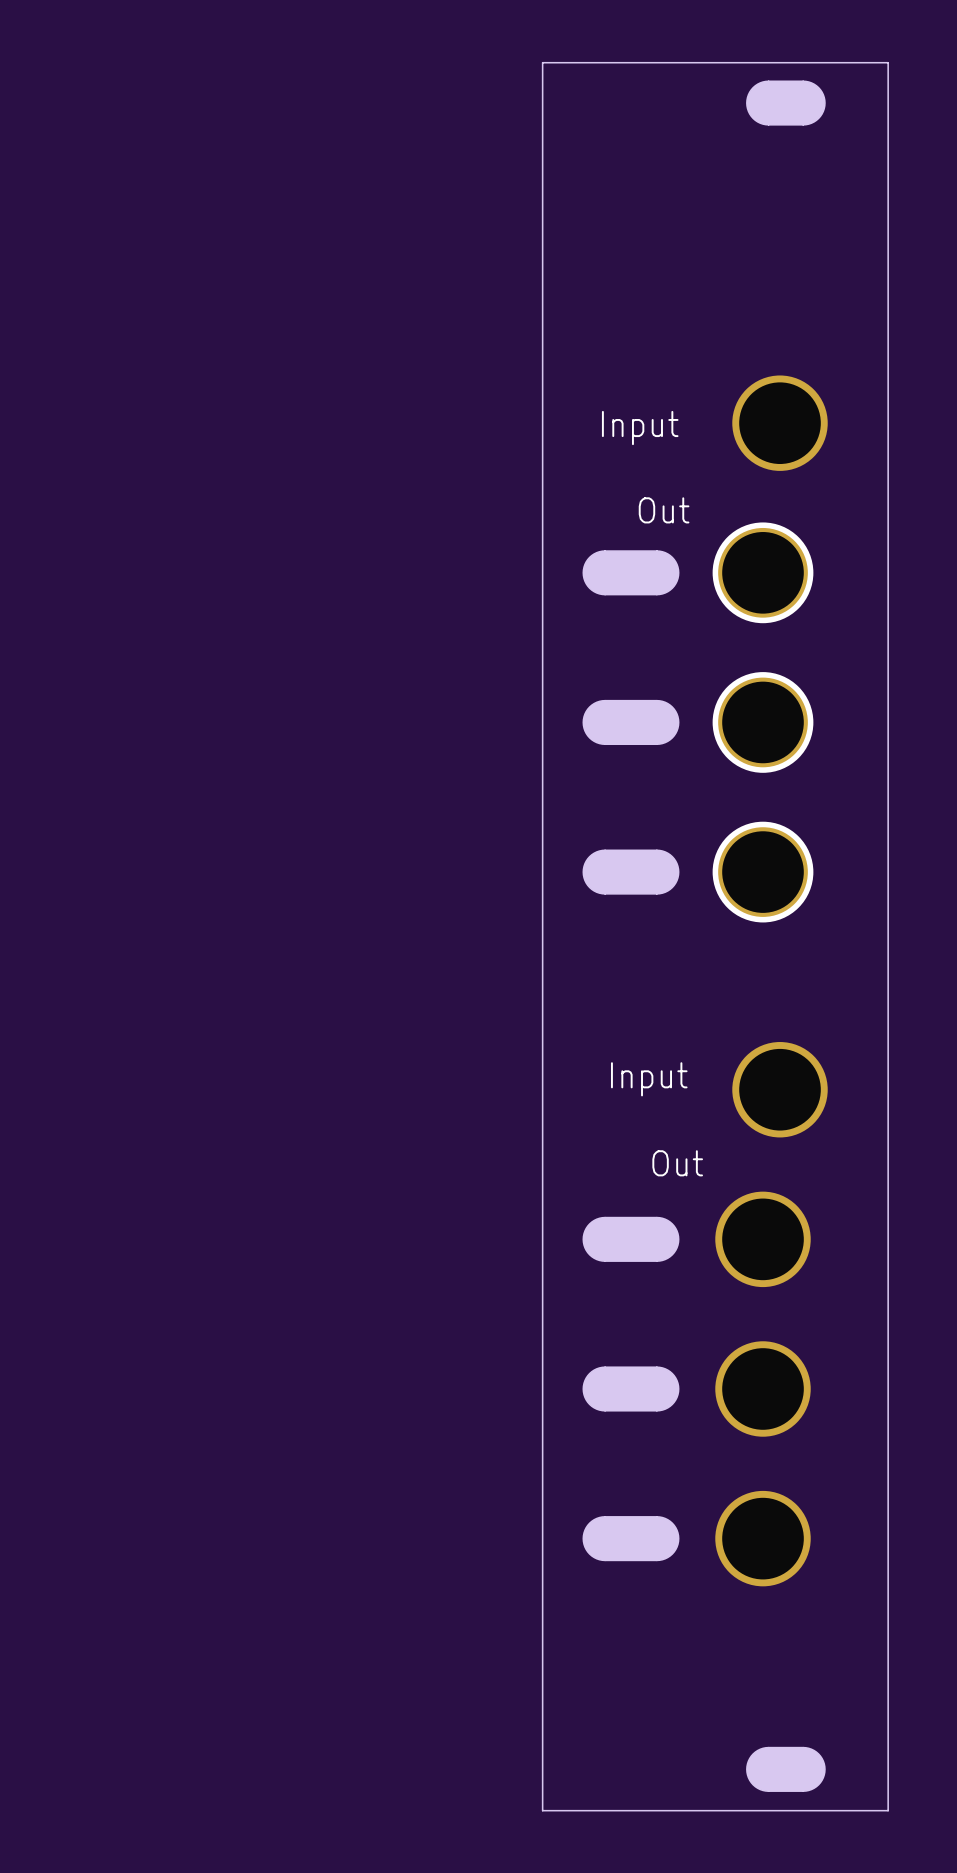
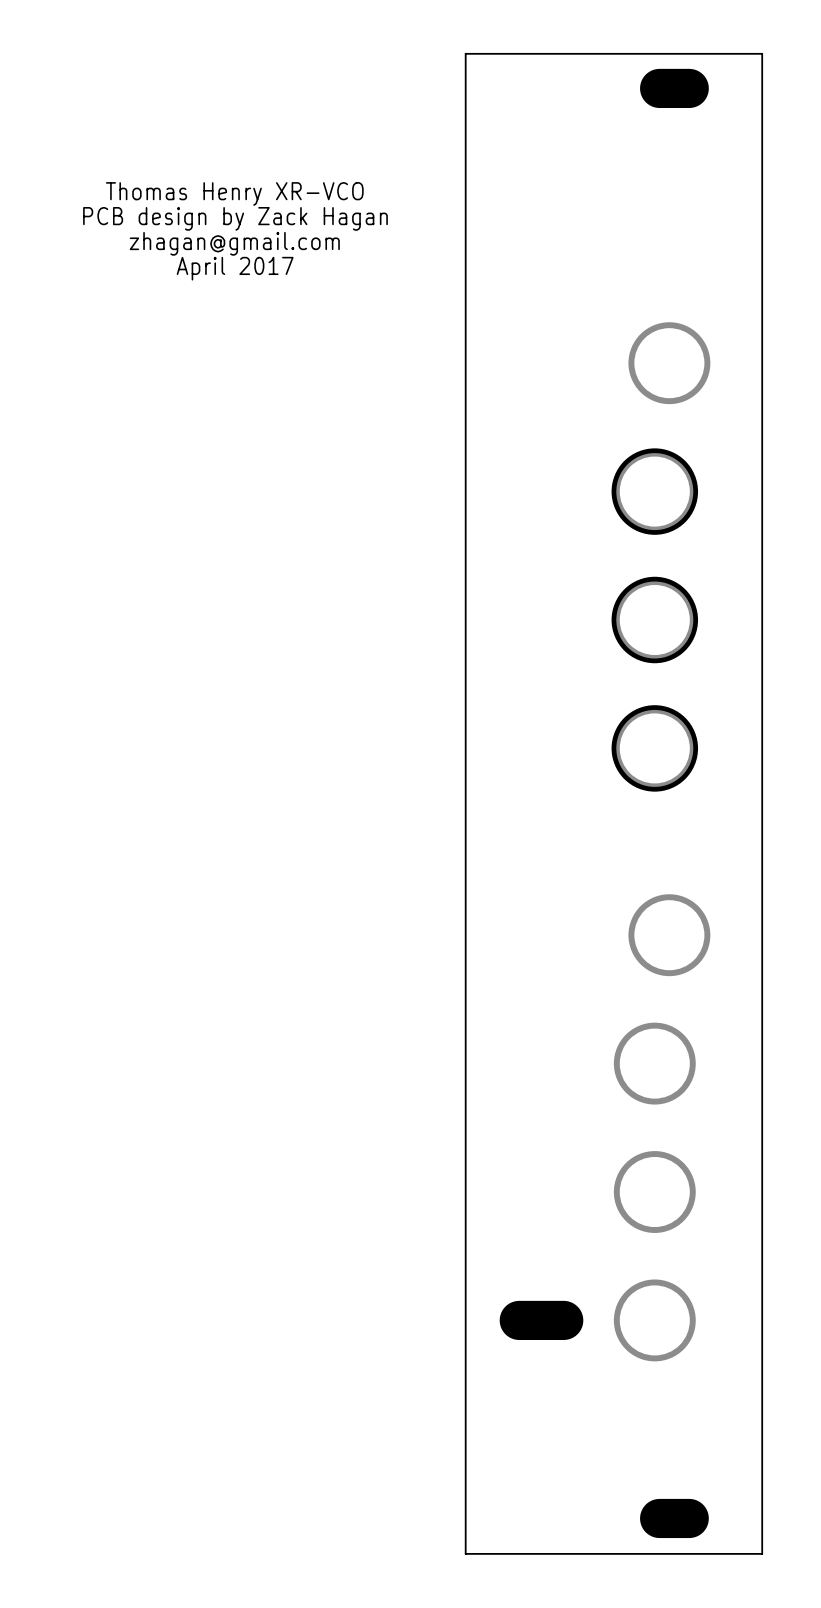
text: none -> Thomas Henry XR-VCO (234, 193)
text: none -> PCB design by Zack Hagan (235, 218)
text: none -> zhagan@gmail.com (234, 243)
text: none -> April 2017 (235, 268)
text: Input (640, 428) -> none
text: Out (664, 510) -> none
drawing: [583, 551, 679, 595] -> none
drawing: [583, 700, 679, 745] -> none
drawing: [583, 850, 679, 894] -> none
text: Input (649, 1079) -> none
text: Out (677, 1163) -> none
drawing: [583, 1217, 679, 1262] -> none
drawing: [583, 1367, 679, 1411] -> none

